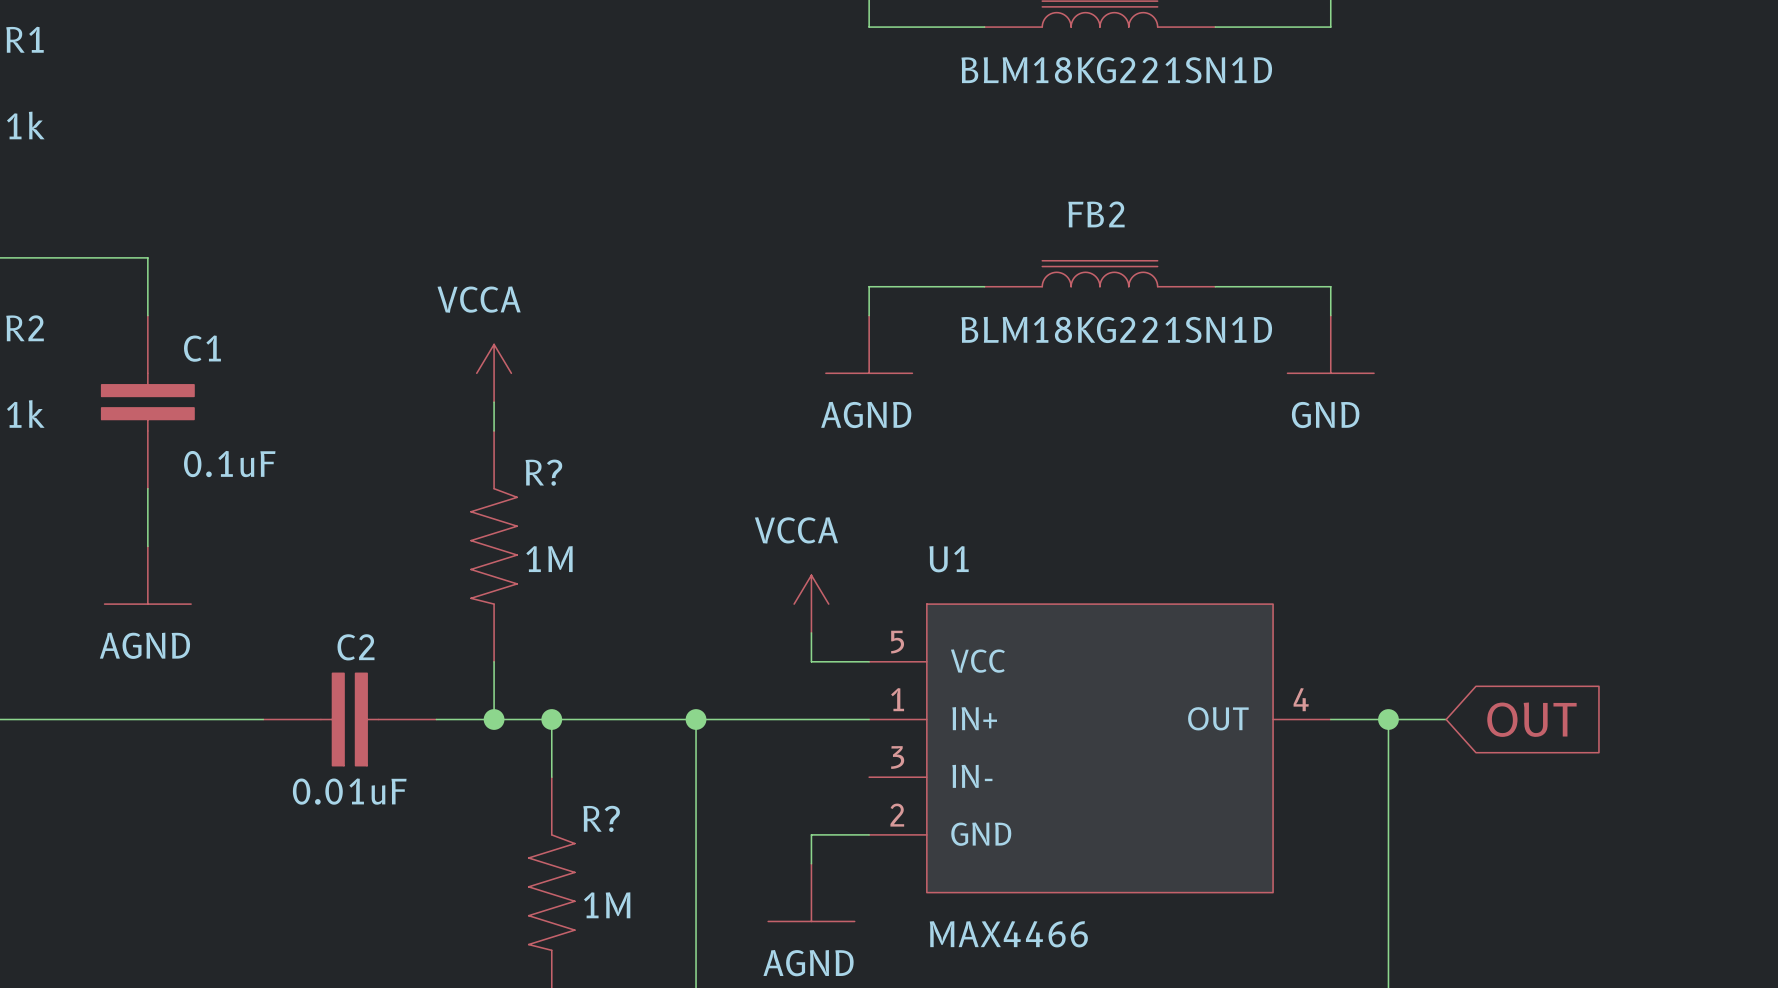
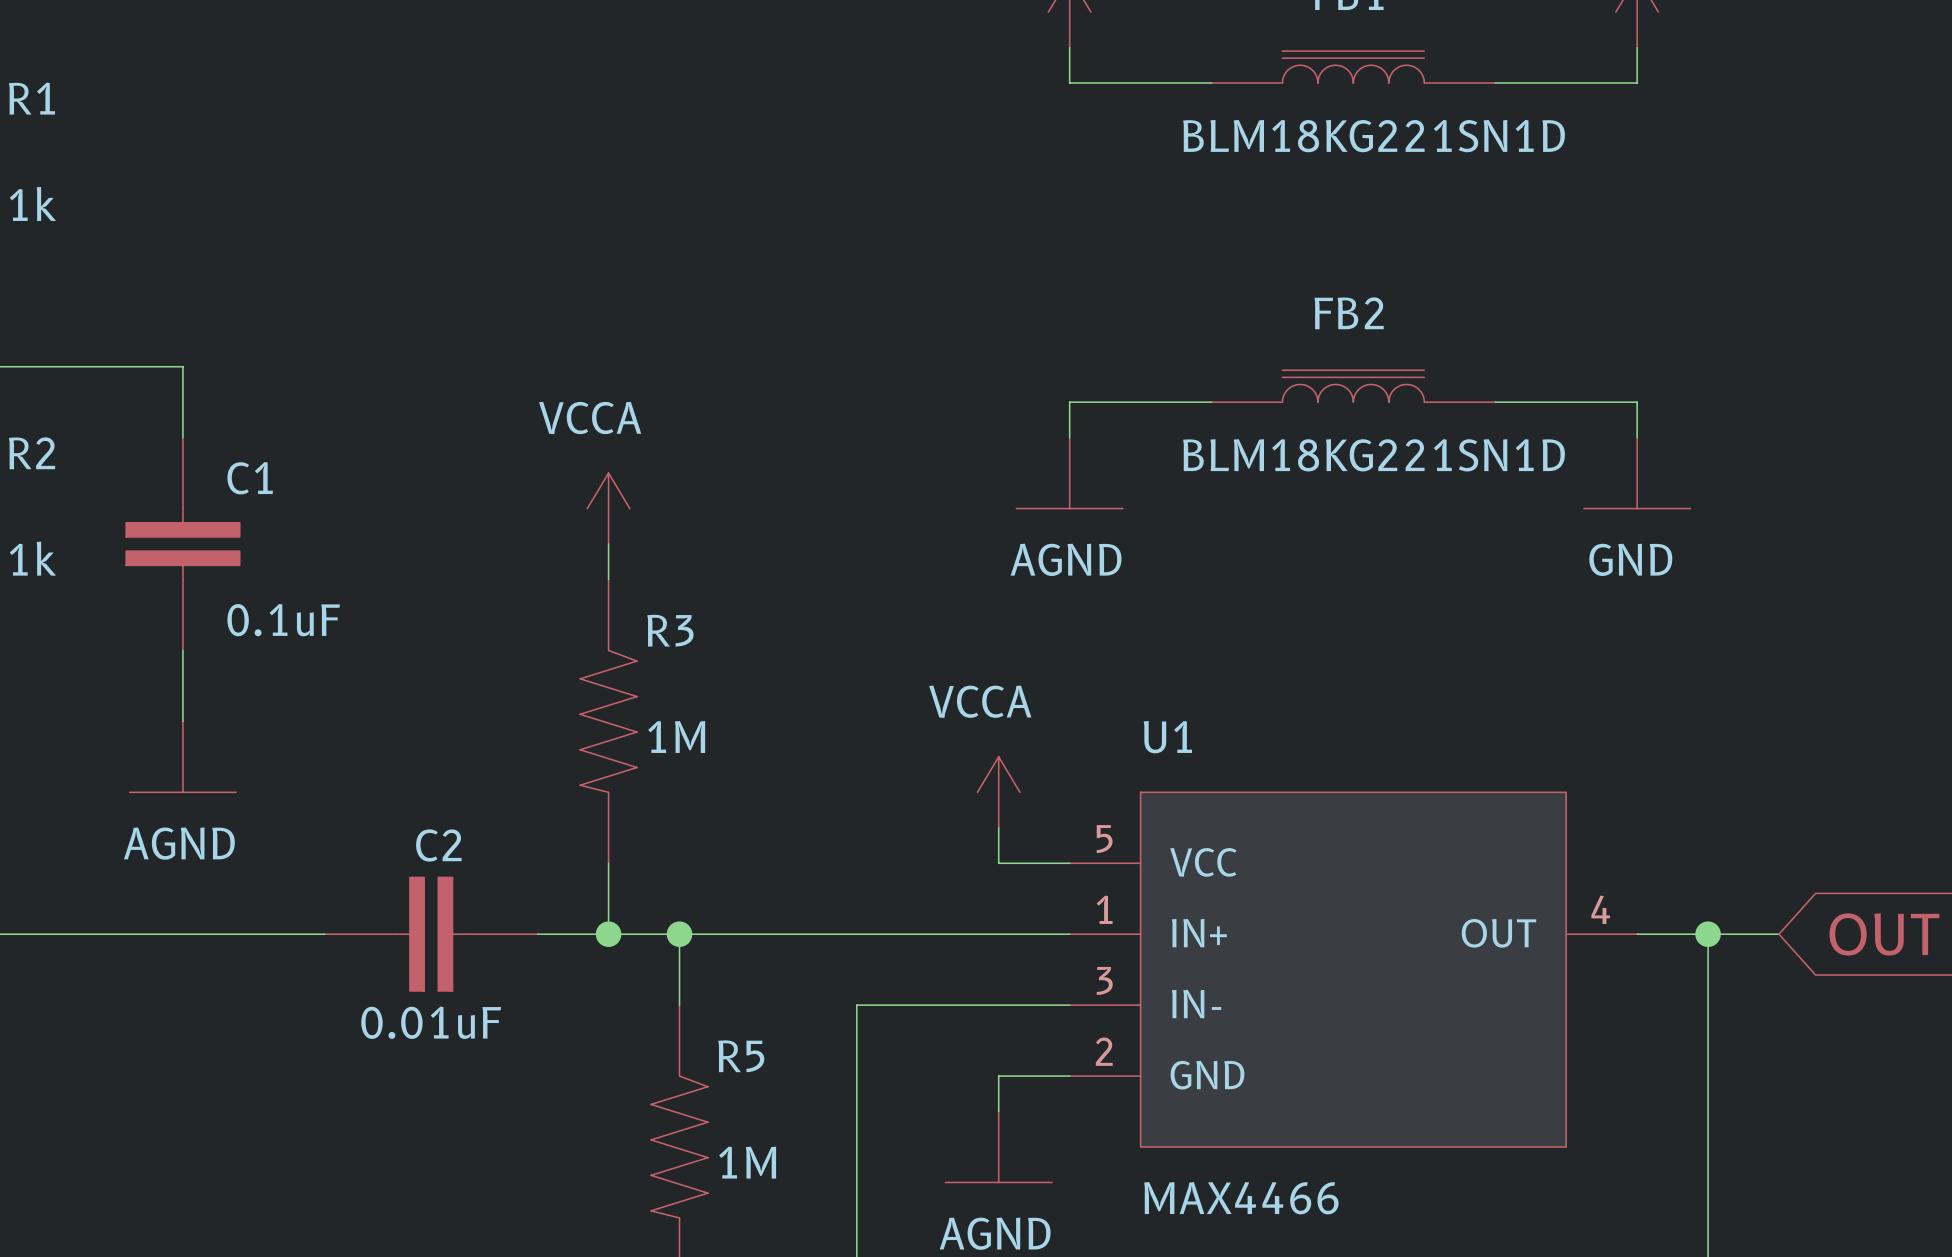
R? name: R? (543, 472) -> R3 (670, 630)
wire: (696, 719) (696, 777) -> (1069, 1005) (856, 1005)
junction: (696, 719) -> none
R? name: R? (601, 818) -> R5 (741, 1056)

